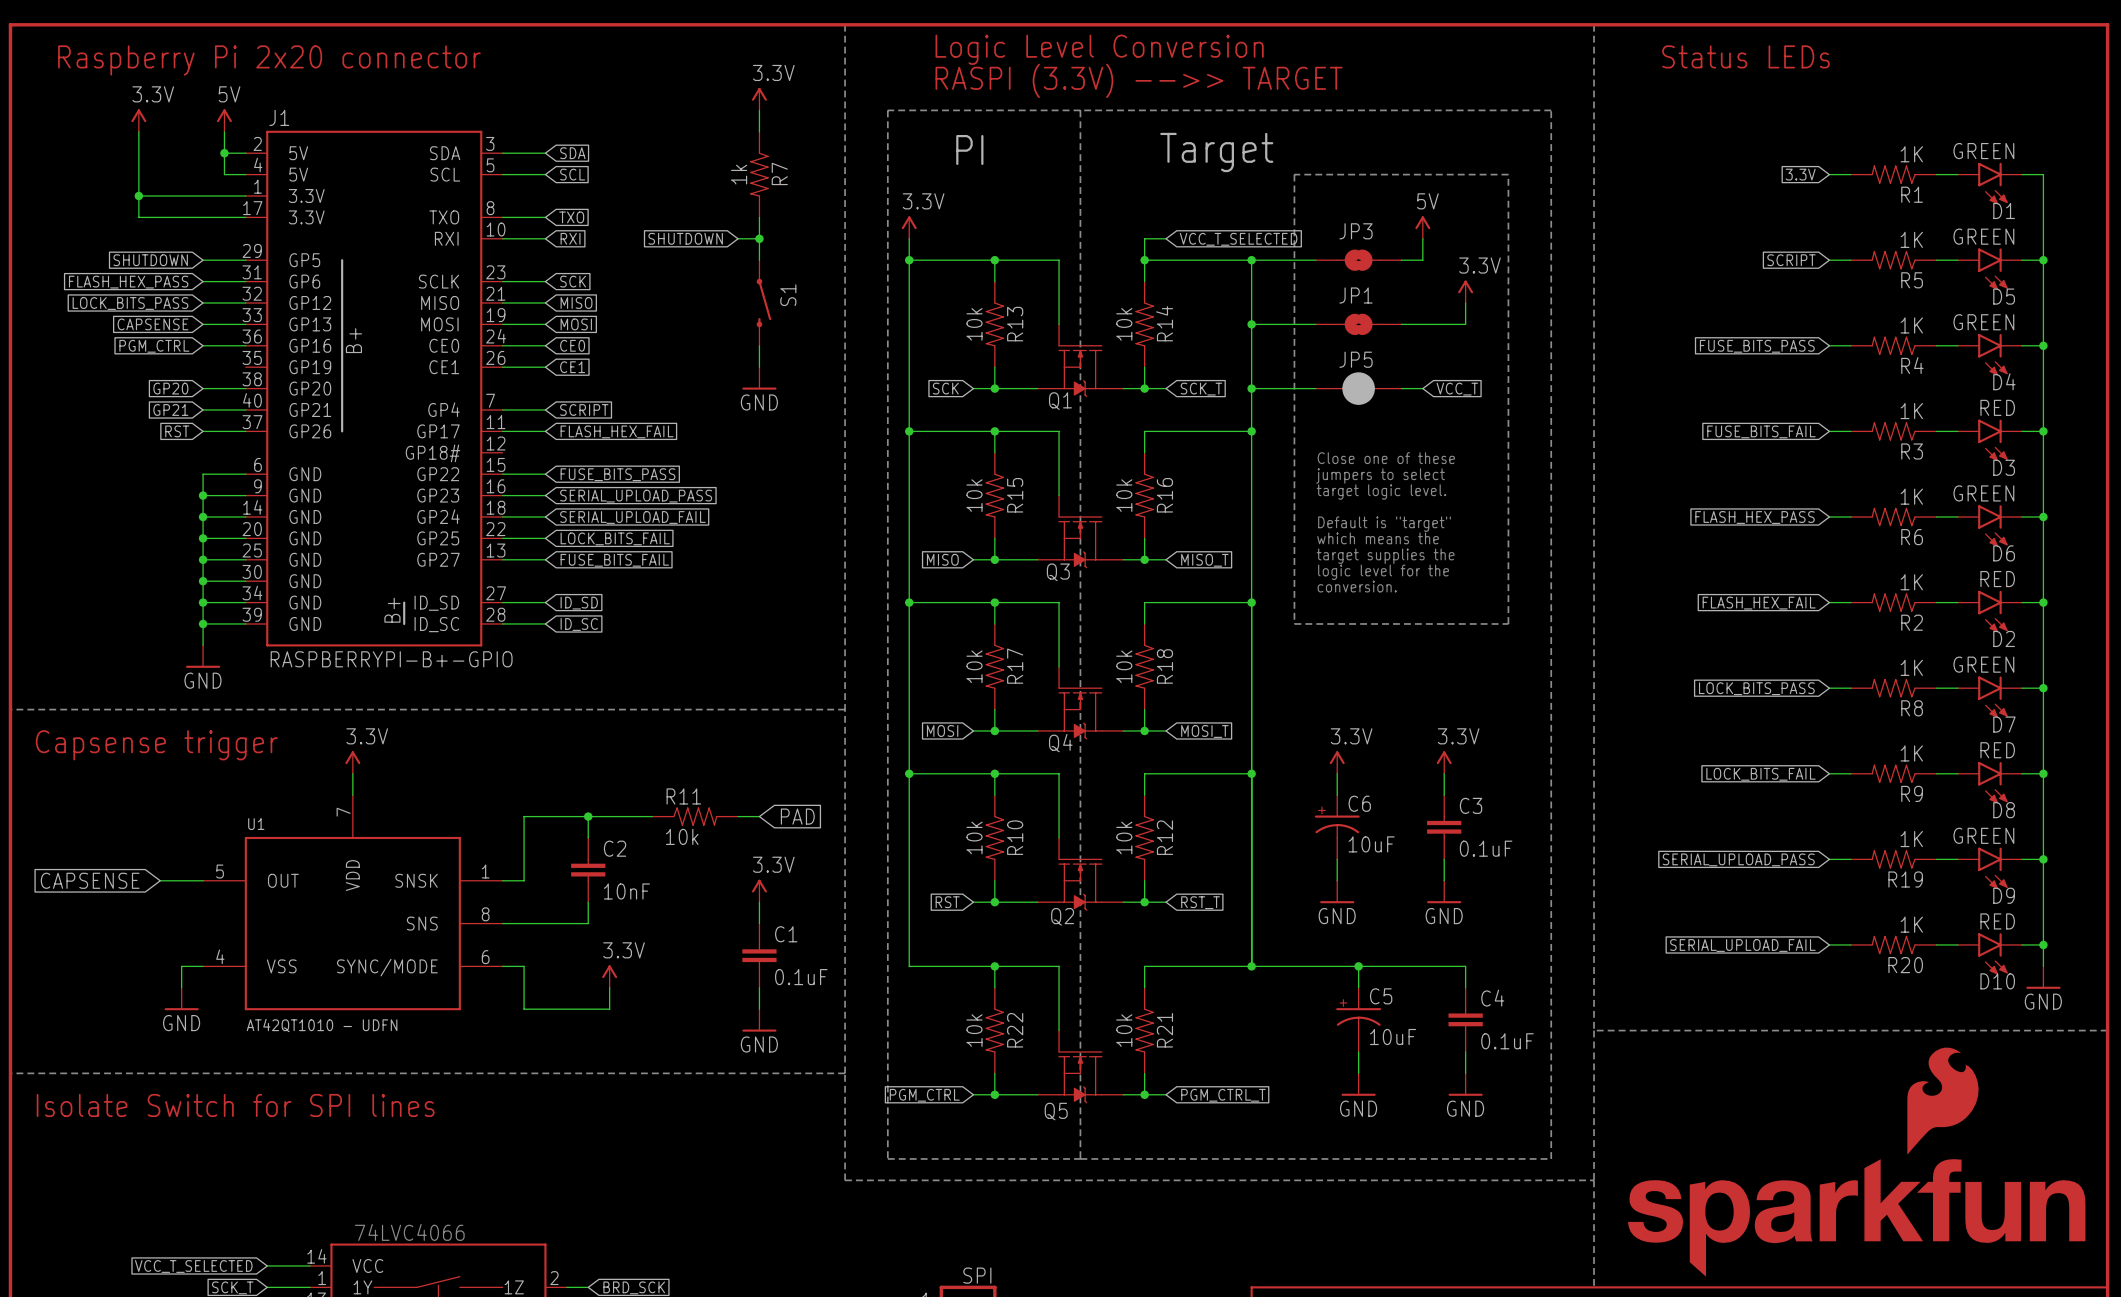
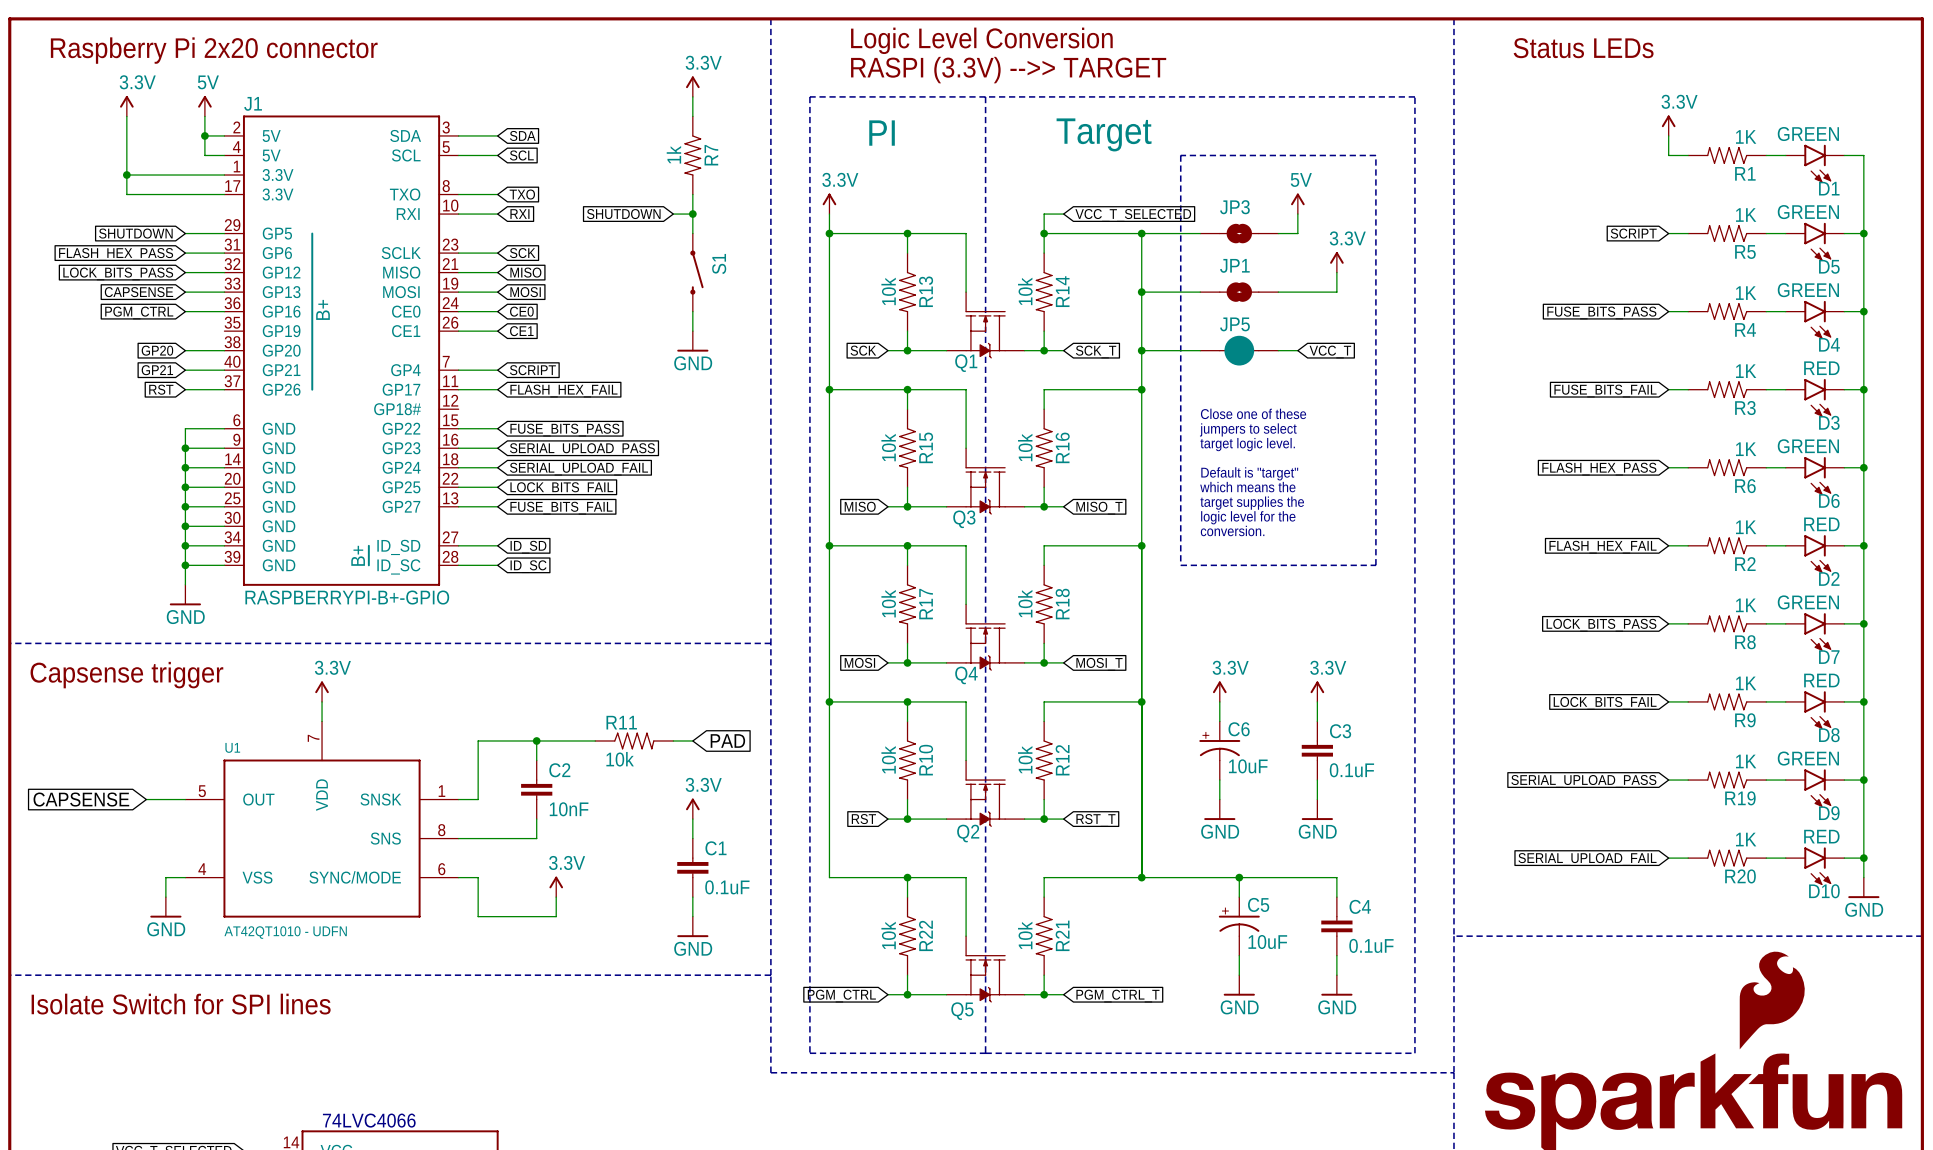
power symbol: none -> 3.3V (1668, 125)
wire: none -> (1668, 135) (1668, 155)
global label: 3.3V (1800, 174) -> none

